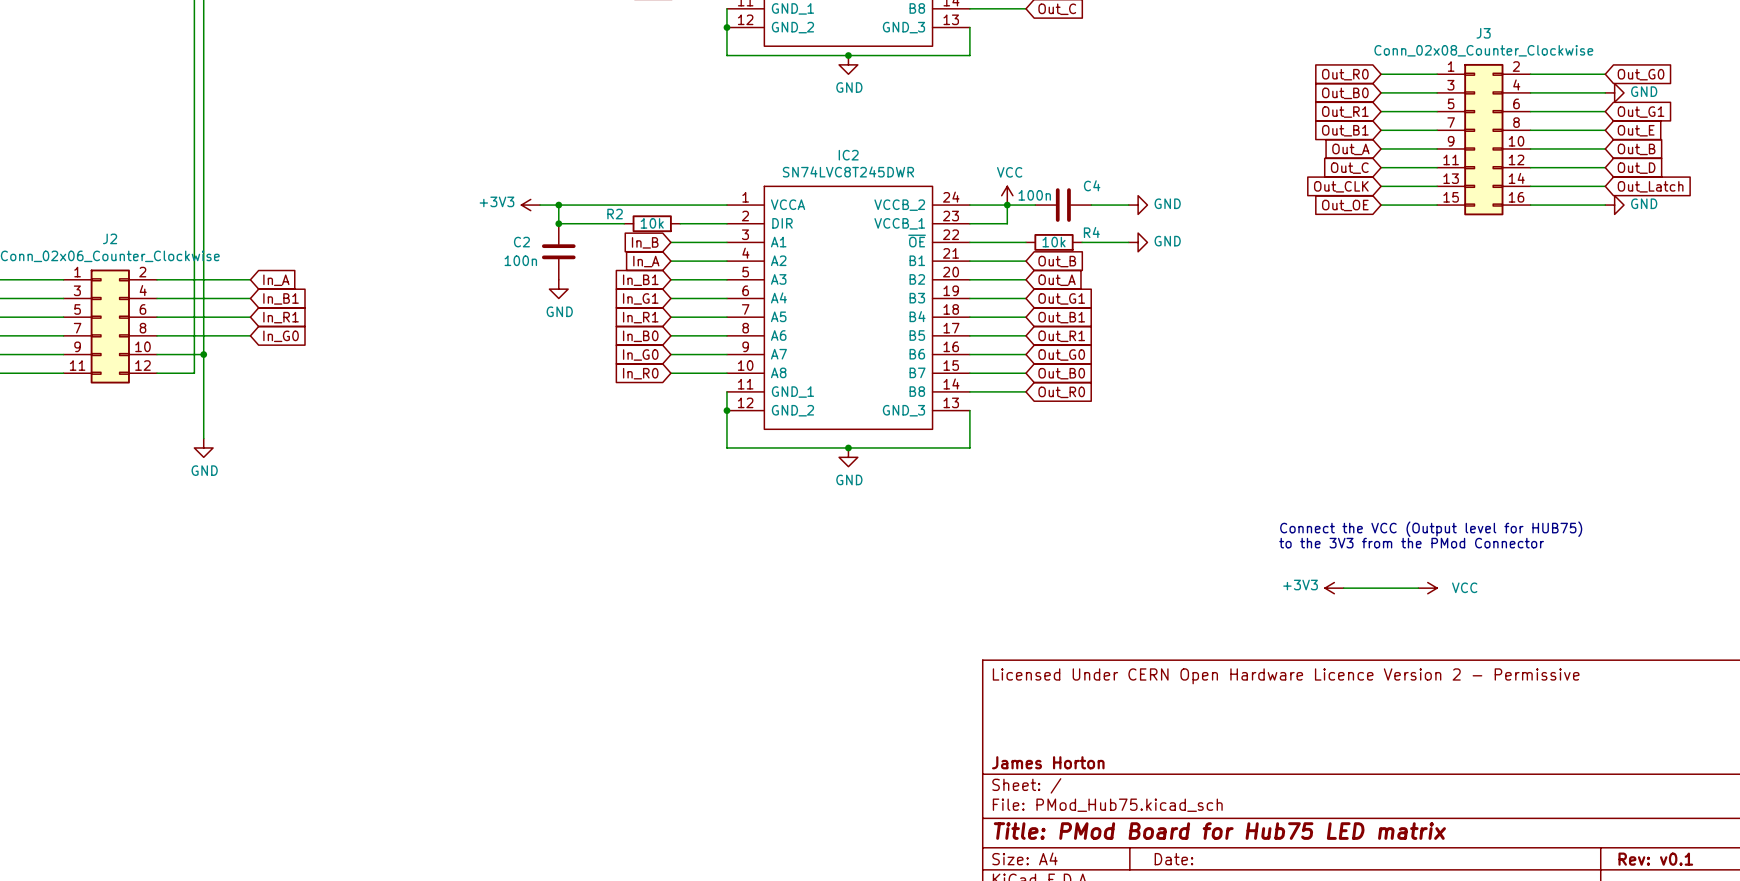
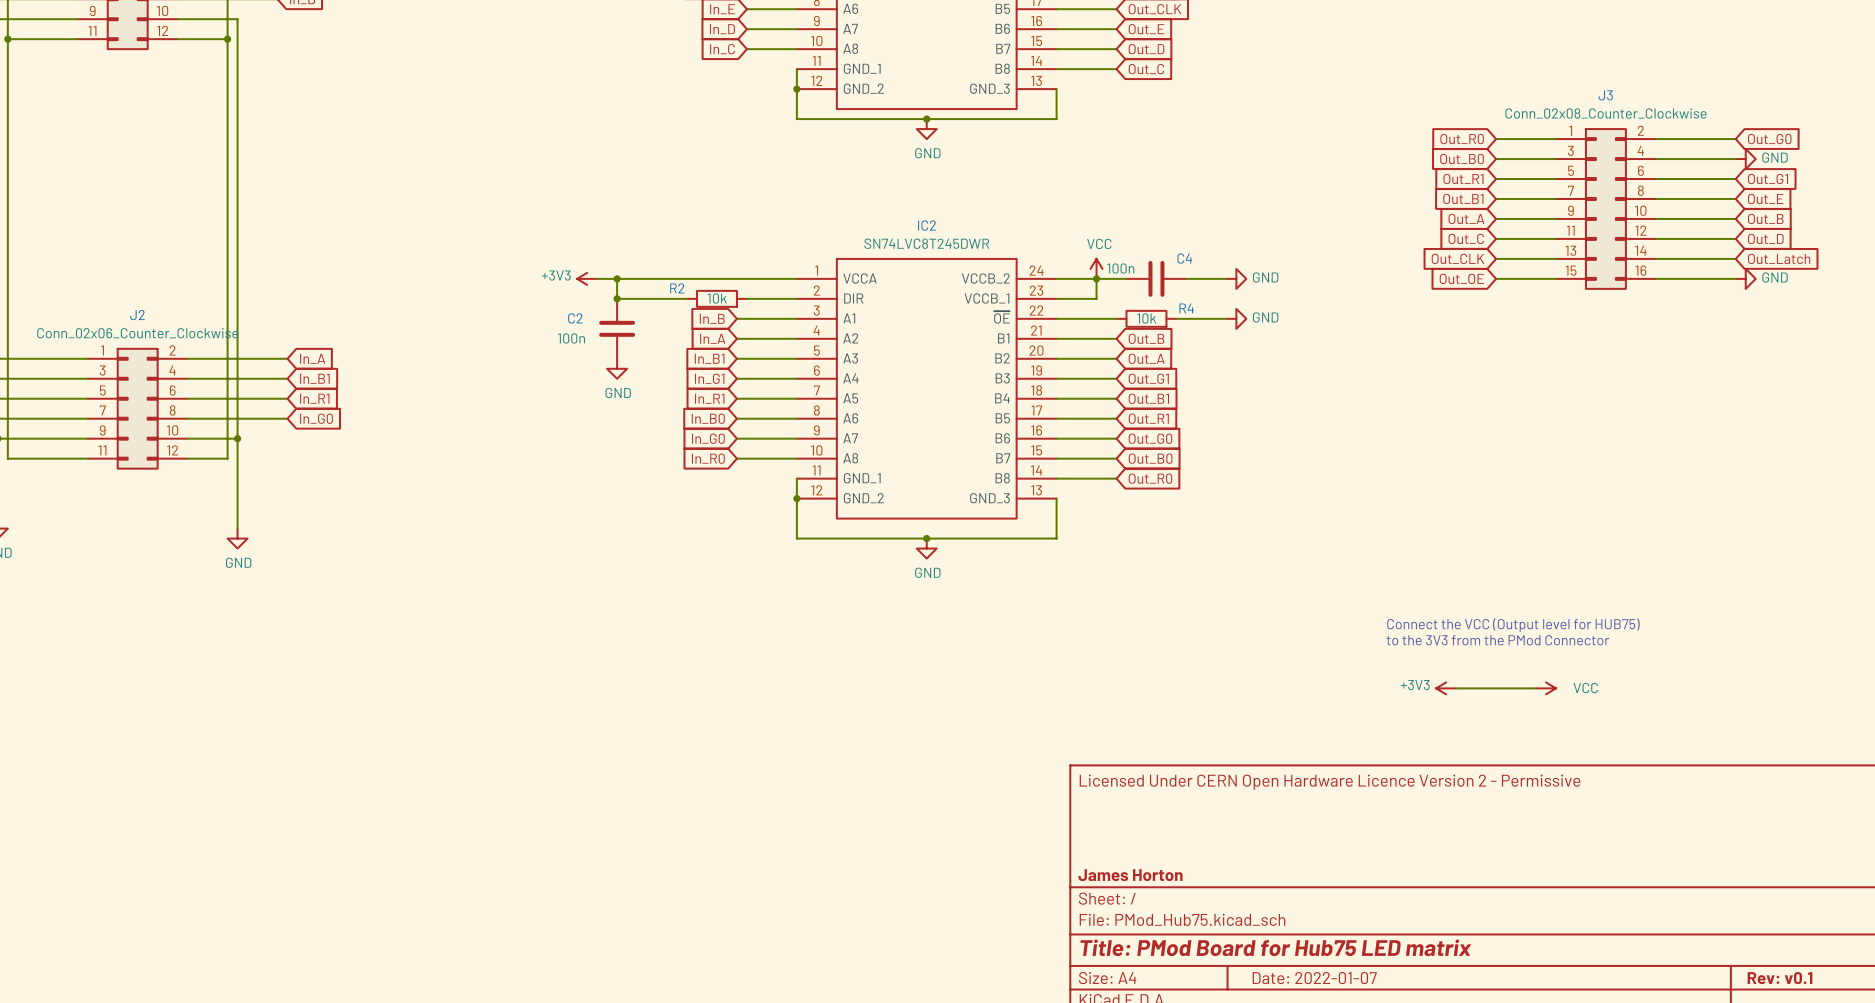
title block: Date: (1173, 859) -> Date: 2022-01-07 (1314, 978)

